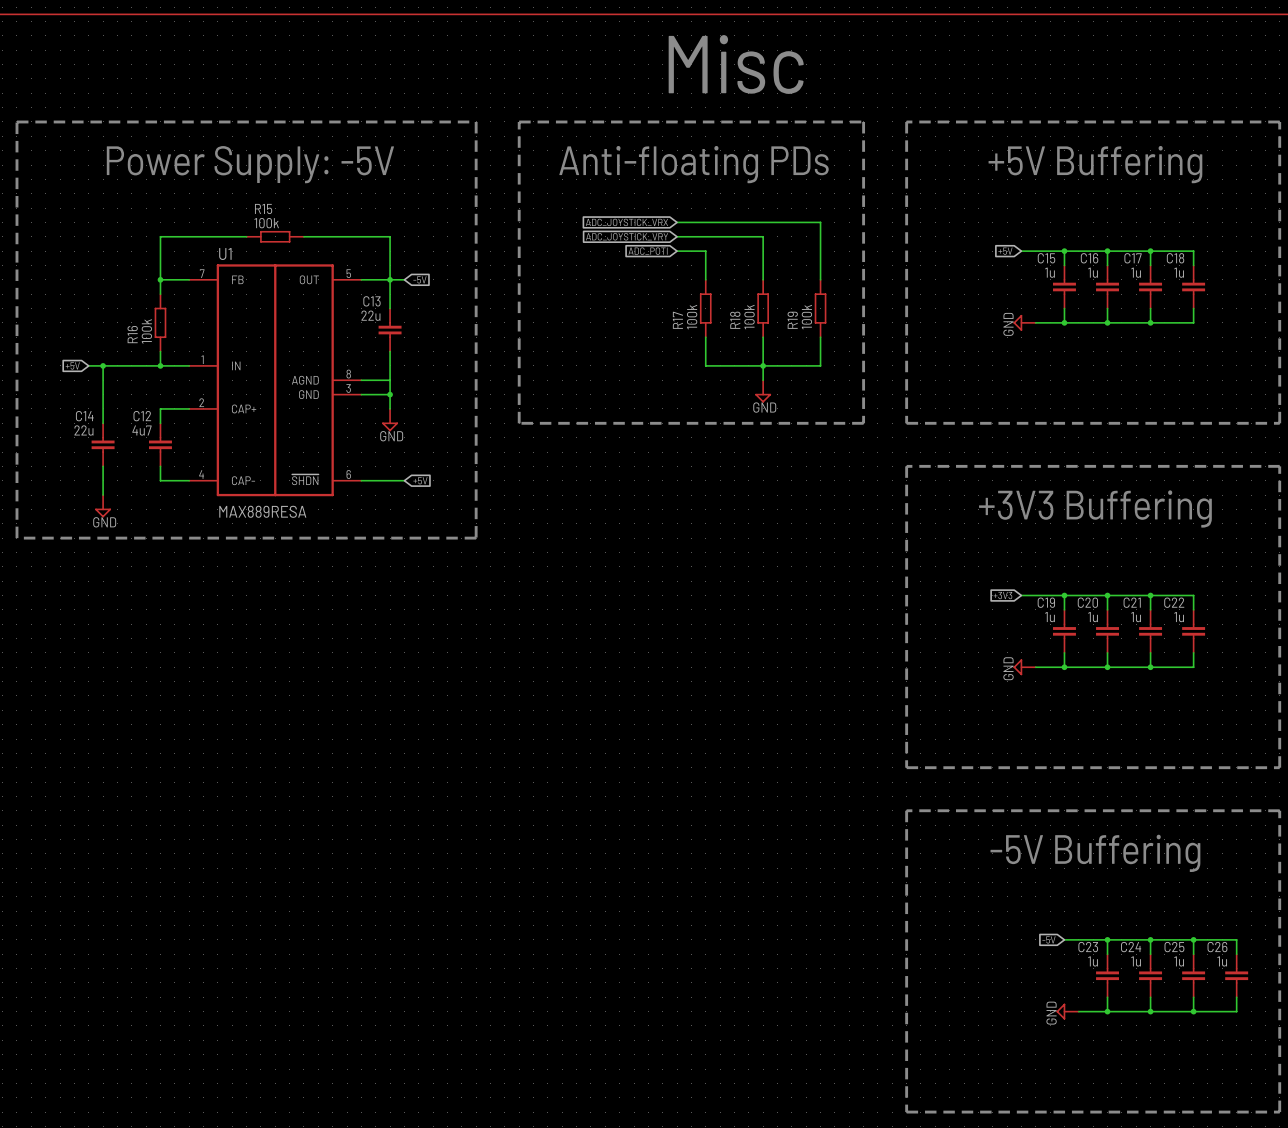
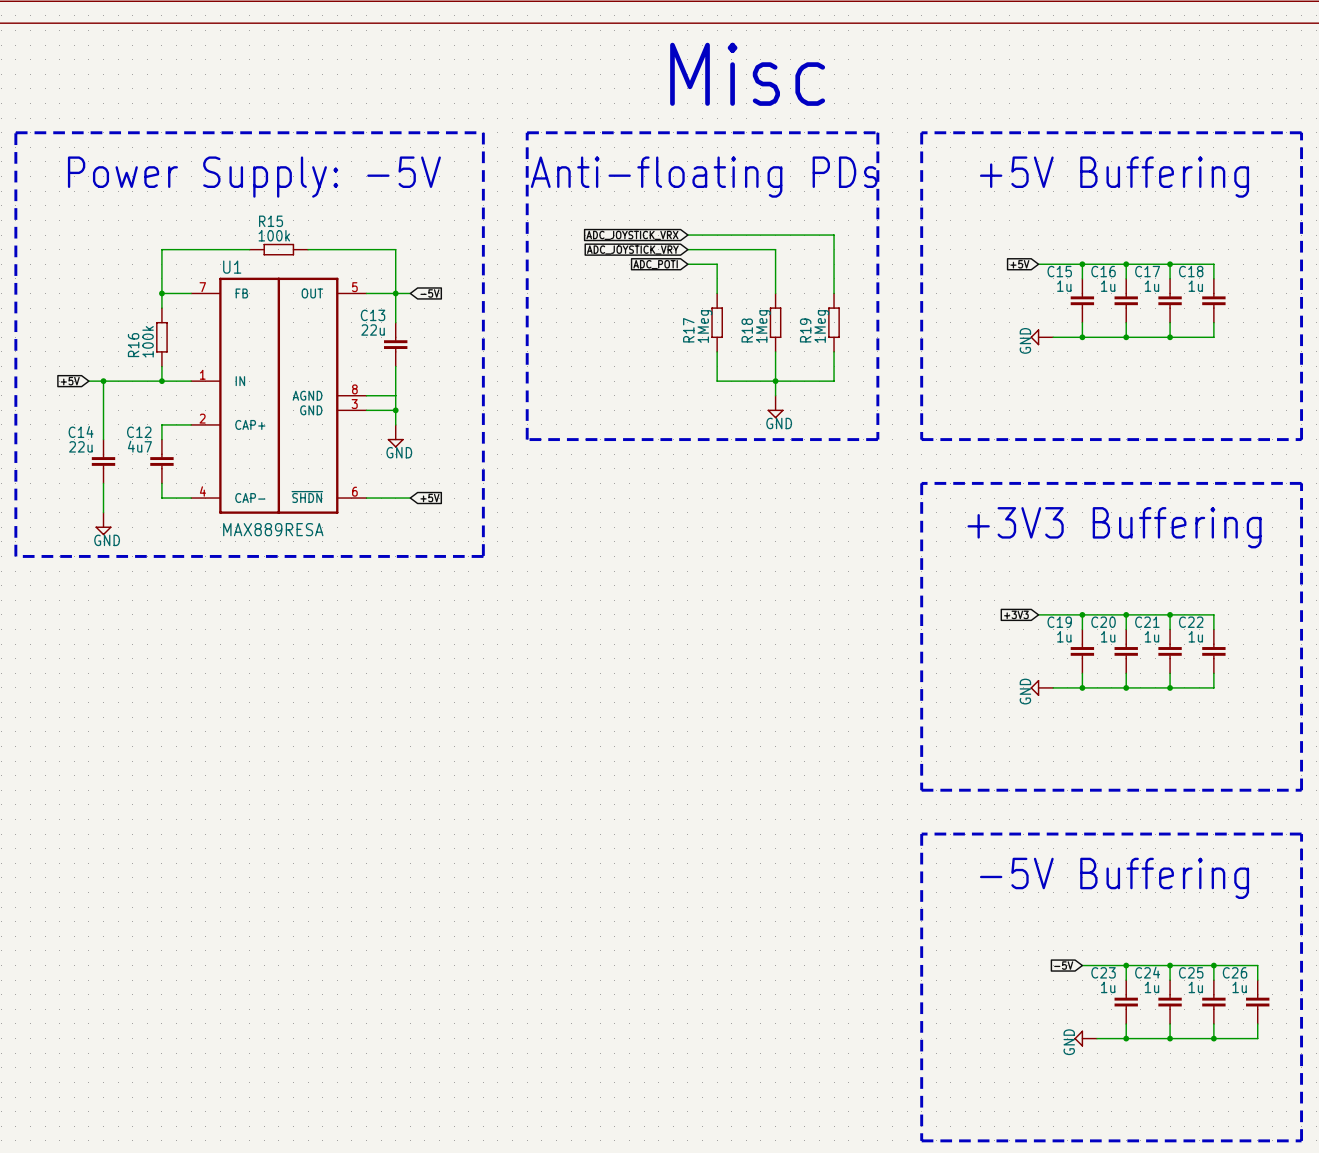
R17 value: 100k (692, 317) -> 1Meg (704, 326)
R18 value: 100k (749, 317) -> 1Meg (763, 326)
R19 value: 100k (806, 317) -> 1Meg (821, 326)

